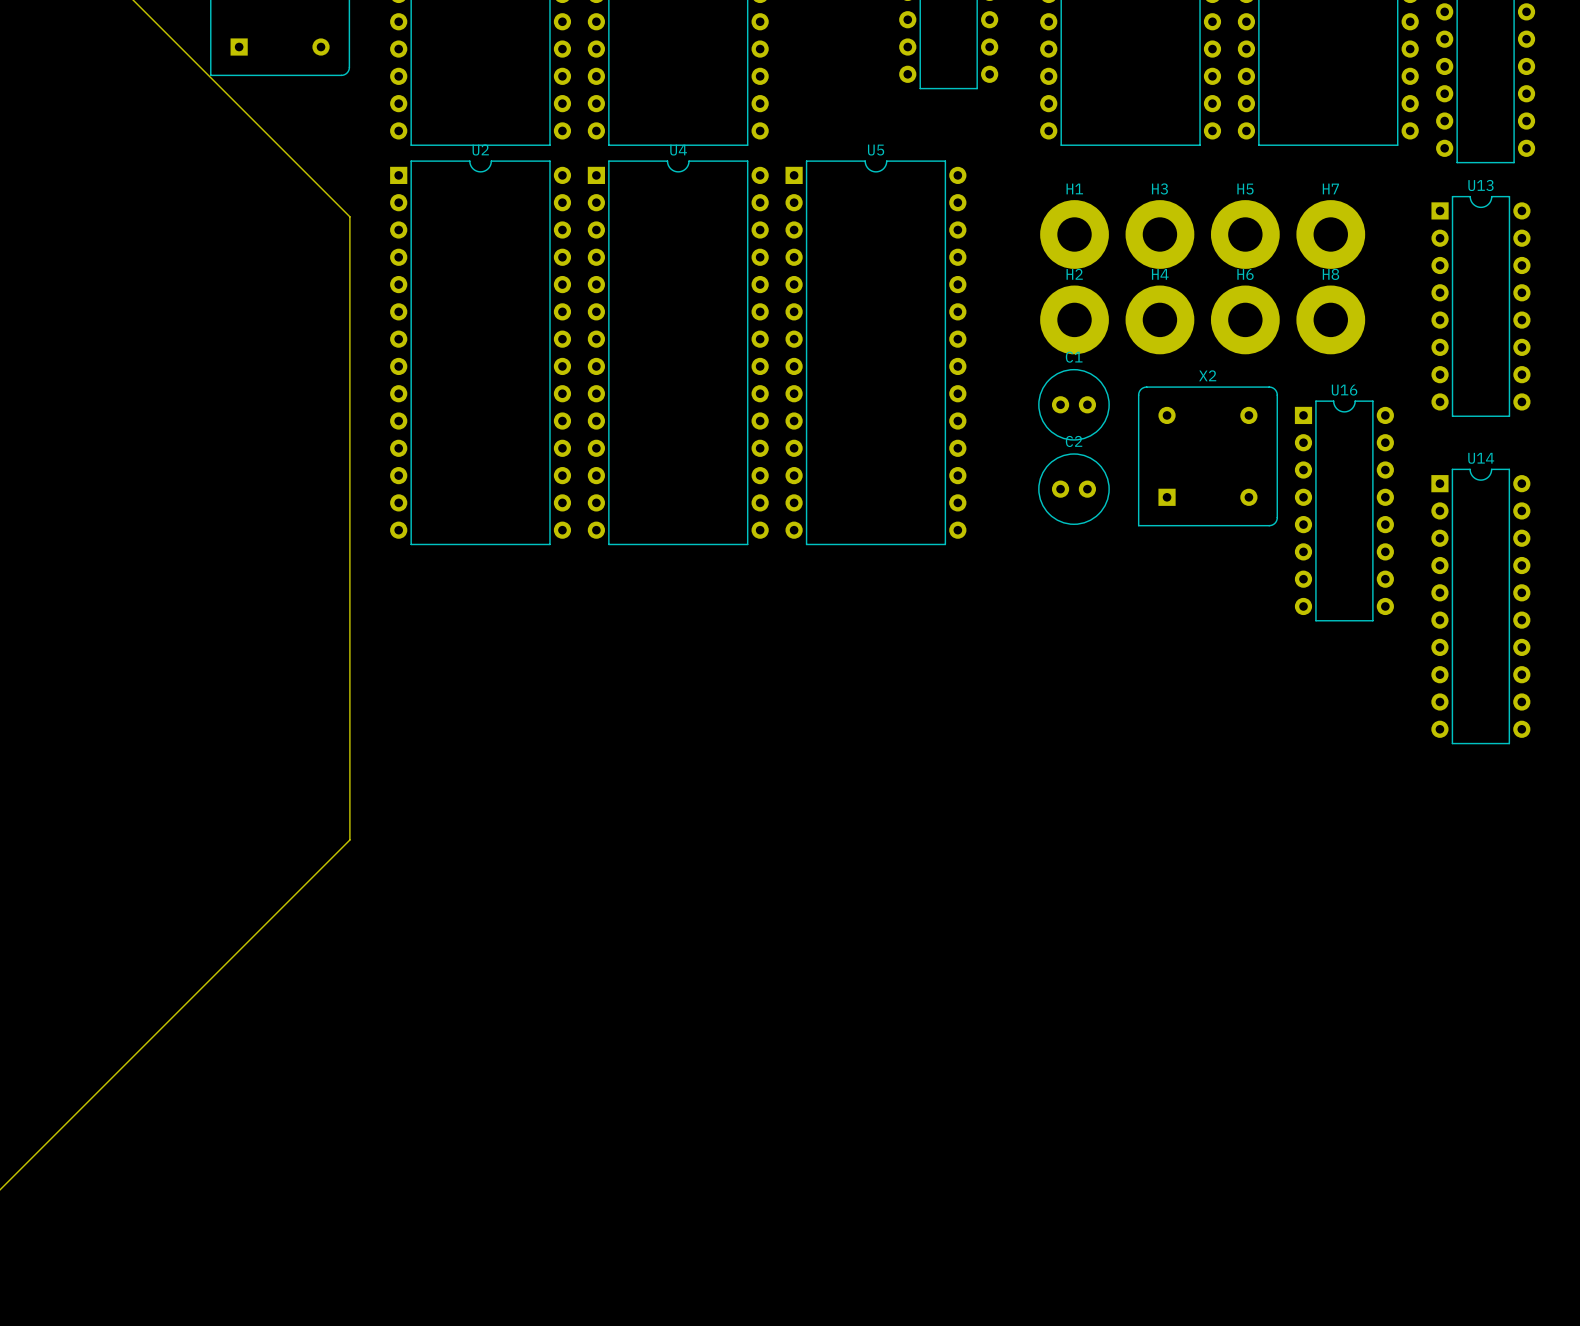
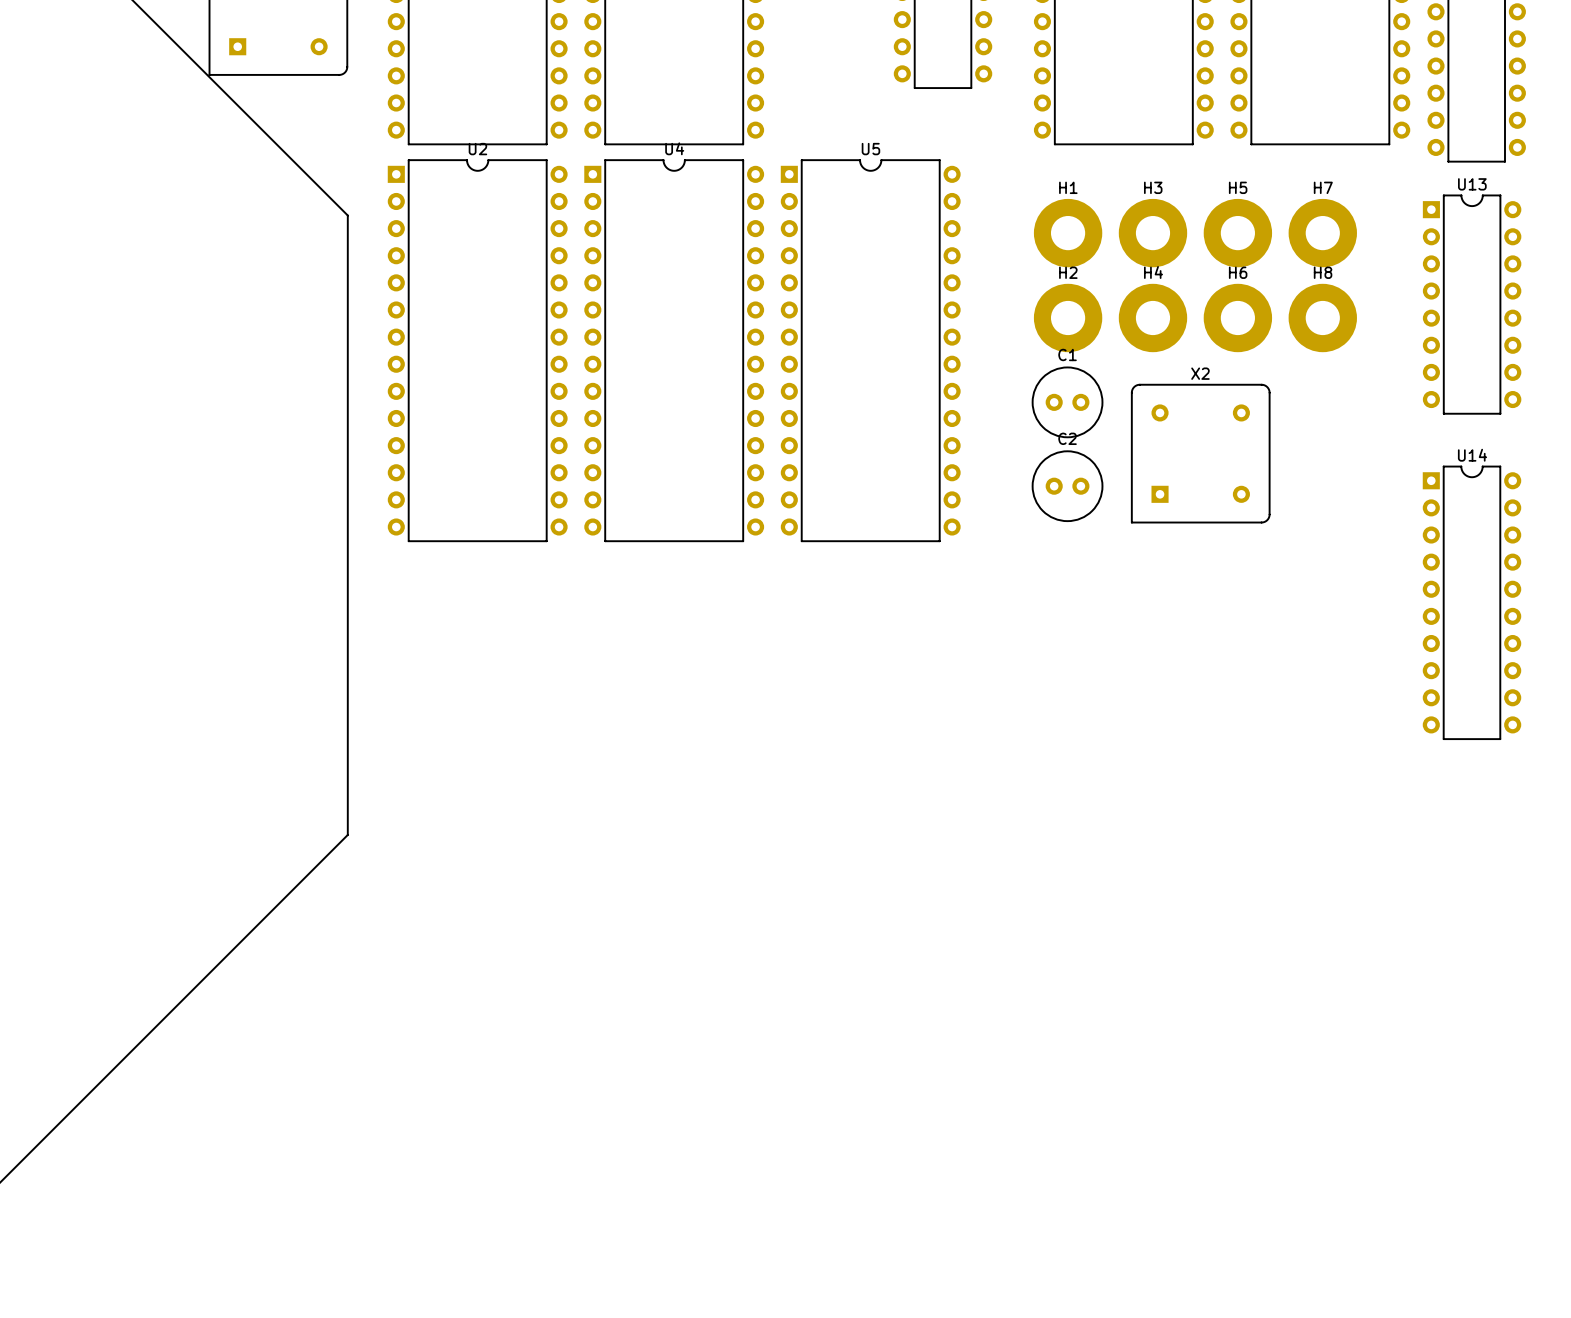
U16: (1344, 510) -> none

